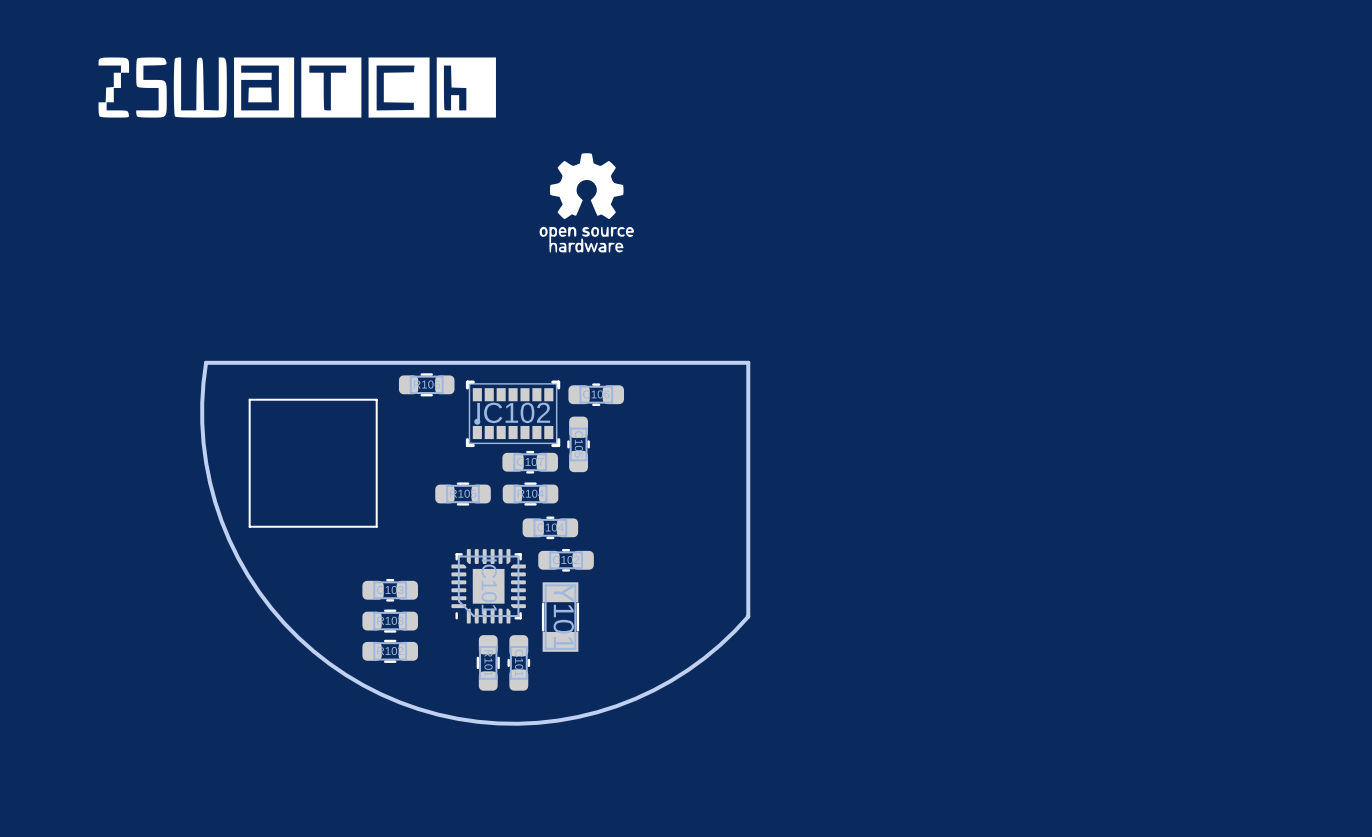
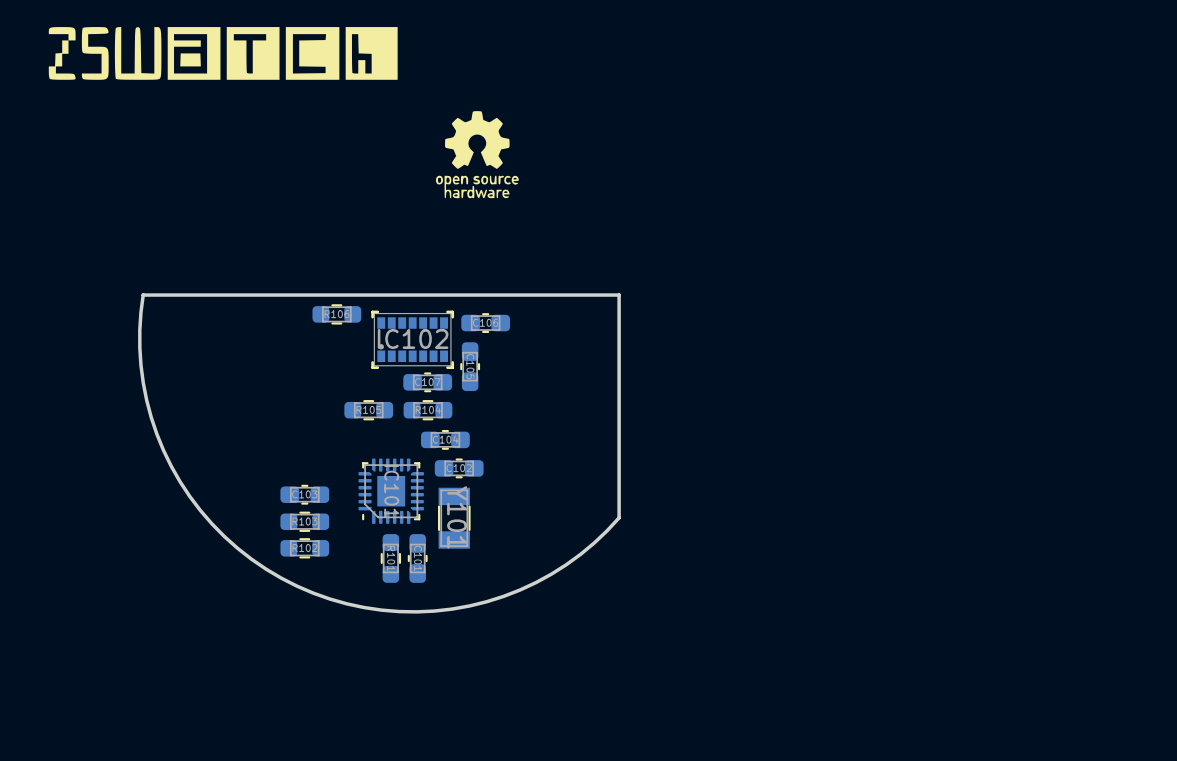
line: (376, 399) (249, 399) (249, 526) (376, 526) (376, 399) -> none

